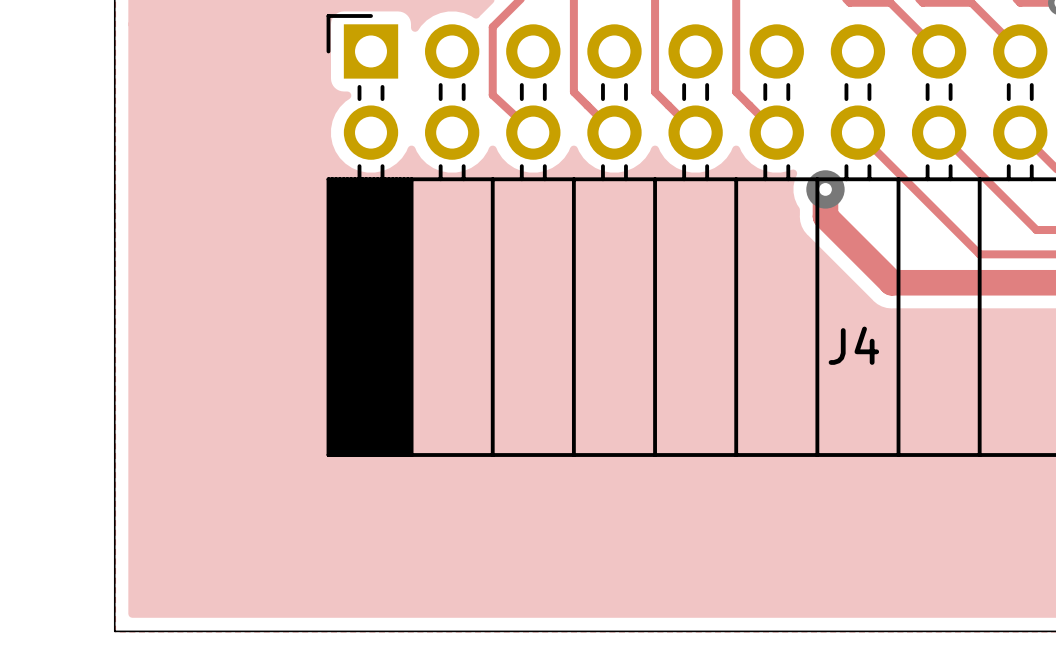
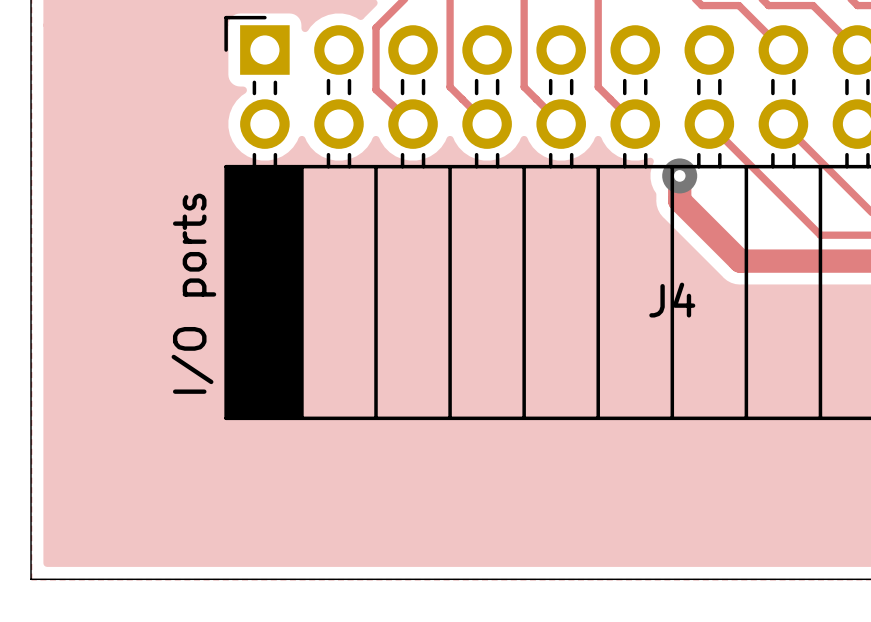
text: none -> I/O ports (193, 293)
J4 name position: J4 (853, 345) -> J4 (672, 300)

